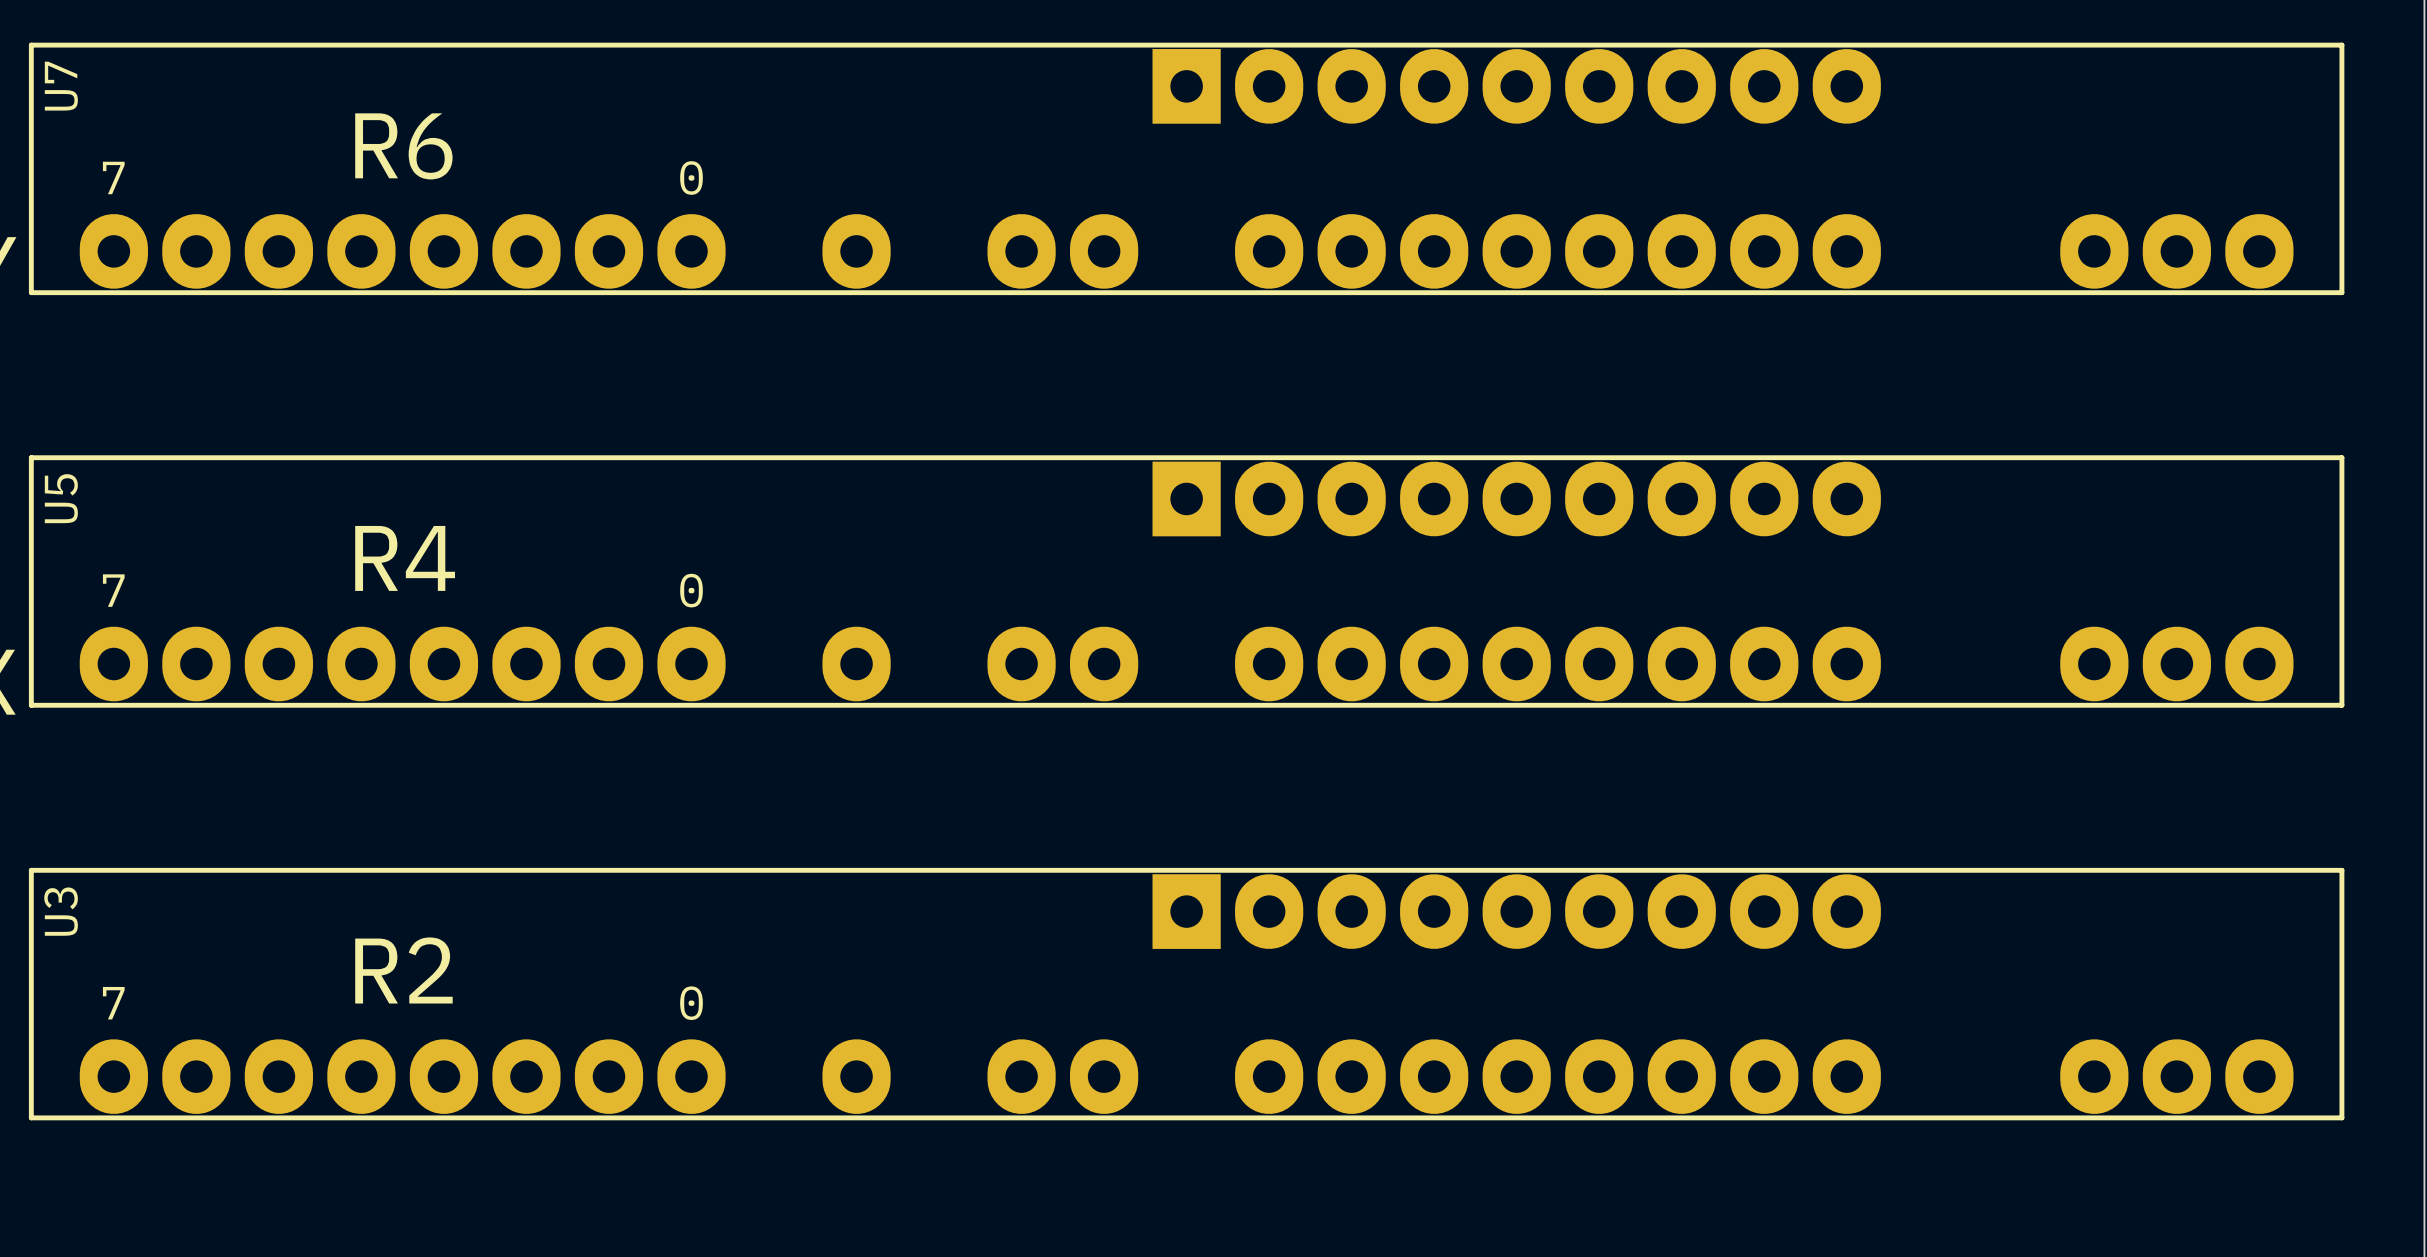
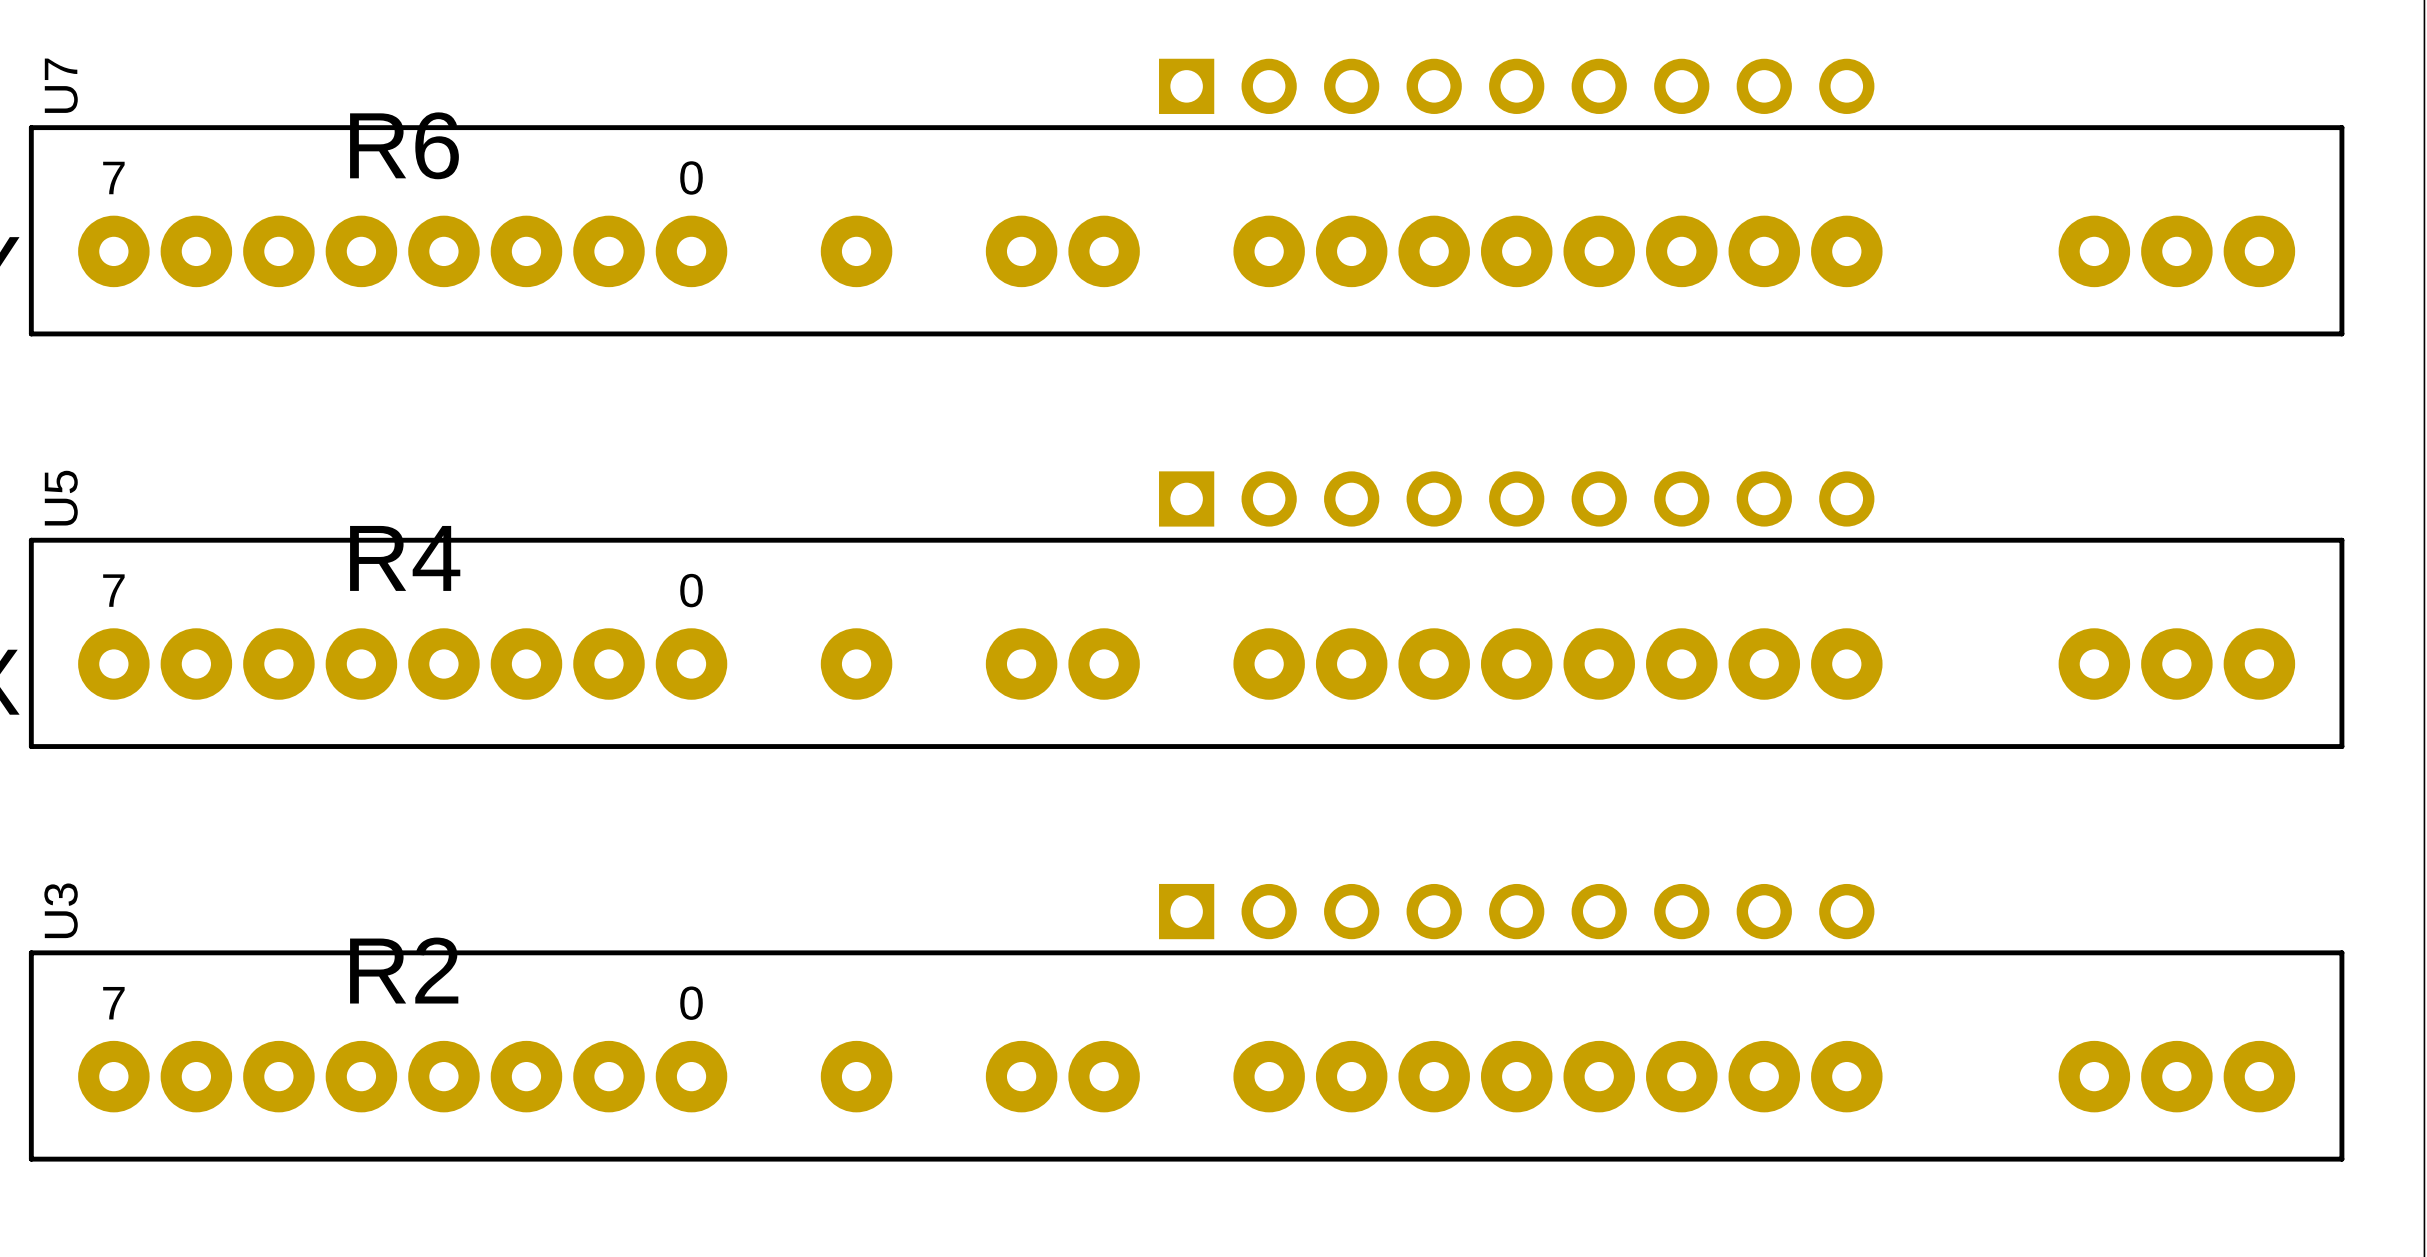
U7 footprint: [28, 42, 2345, 296] -> [28, 125, 2345, 337]
part footprint: [1152, 49, 1881, 124] -> [1159, 58, 1875, 114]
U5 footprint: [28, 455, 2345, 708] -> [28, 537, 2345, 749]
part footprint: [1152, 461, 1881, 537] -> [1159, 471, 1875, 527]
U3 footprint: [28, 867, 2345, 1121] -> [28, 950, 2345, 1162]
part footprint: [1152, 874, 1881, 949] -> [1159, 883, 1875, 940]

